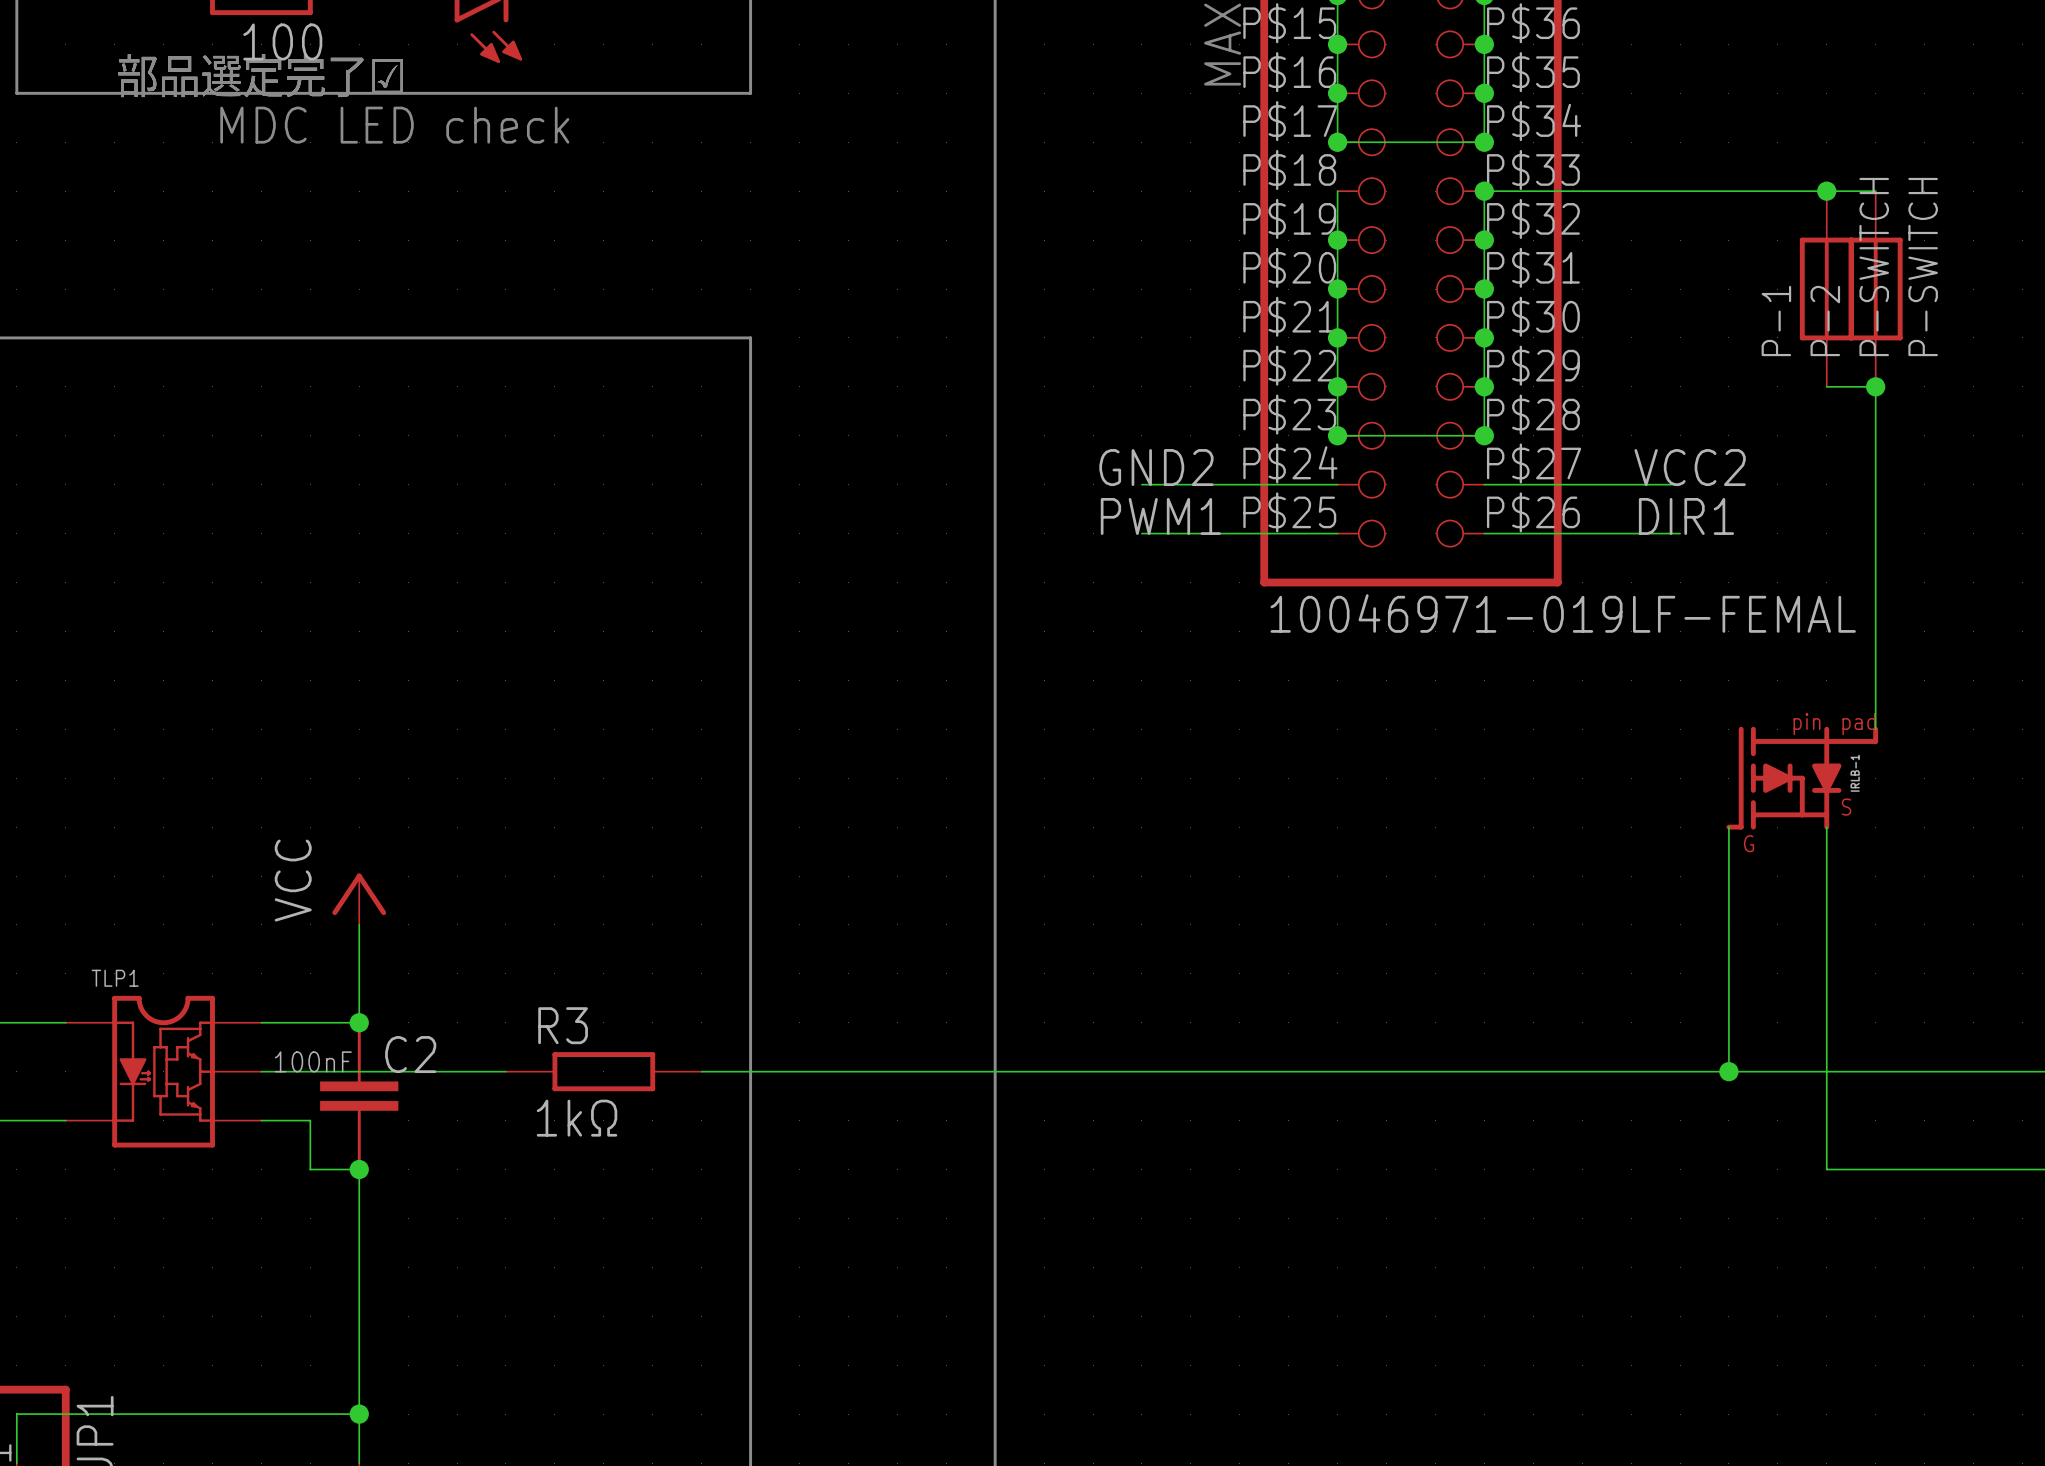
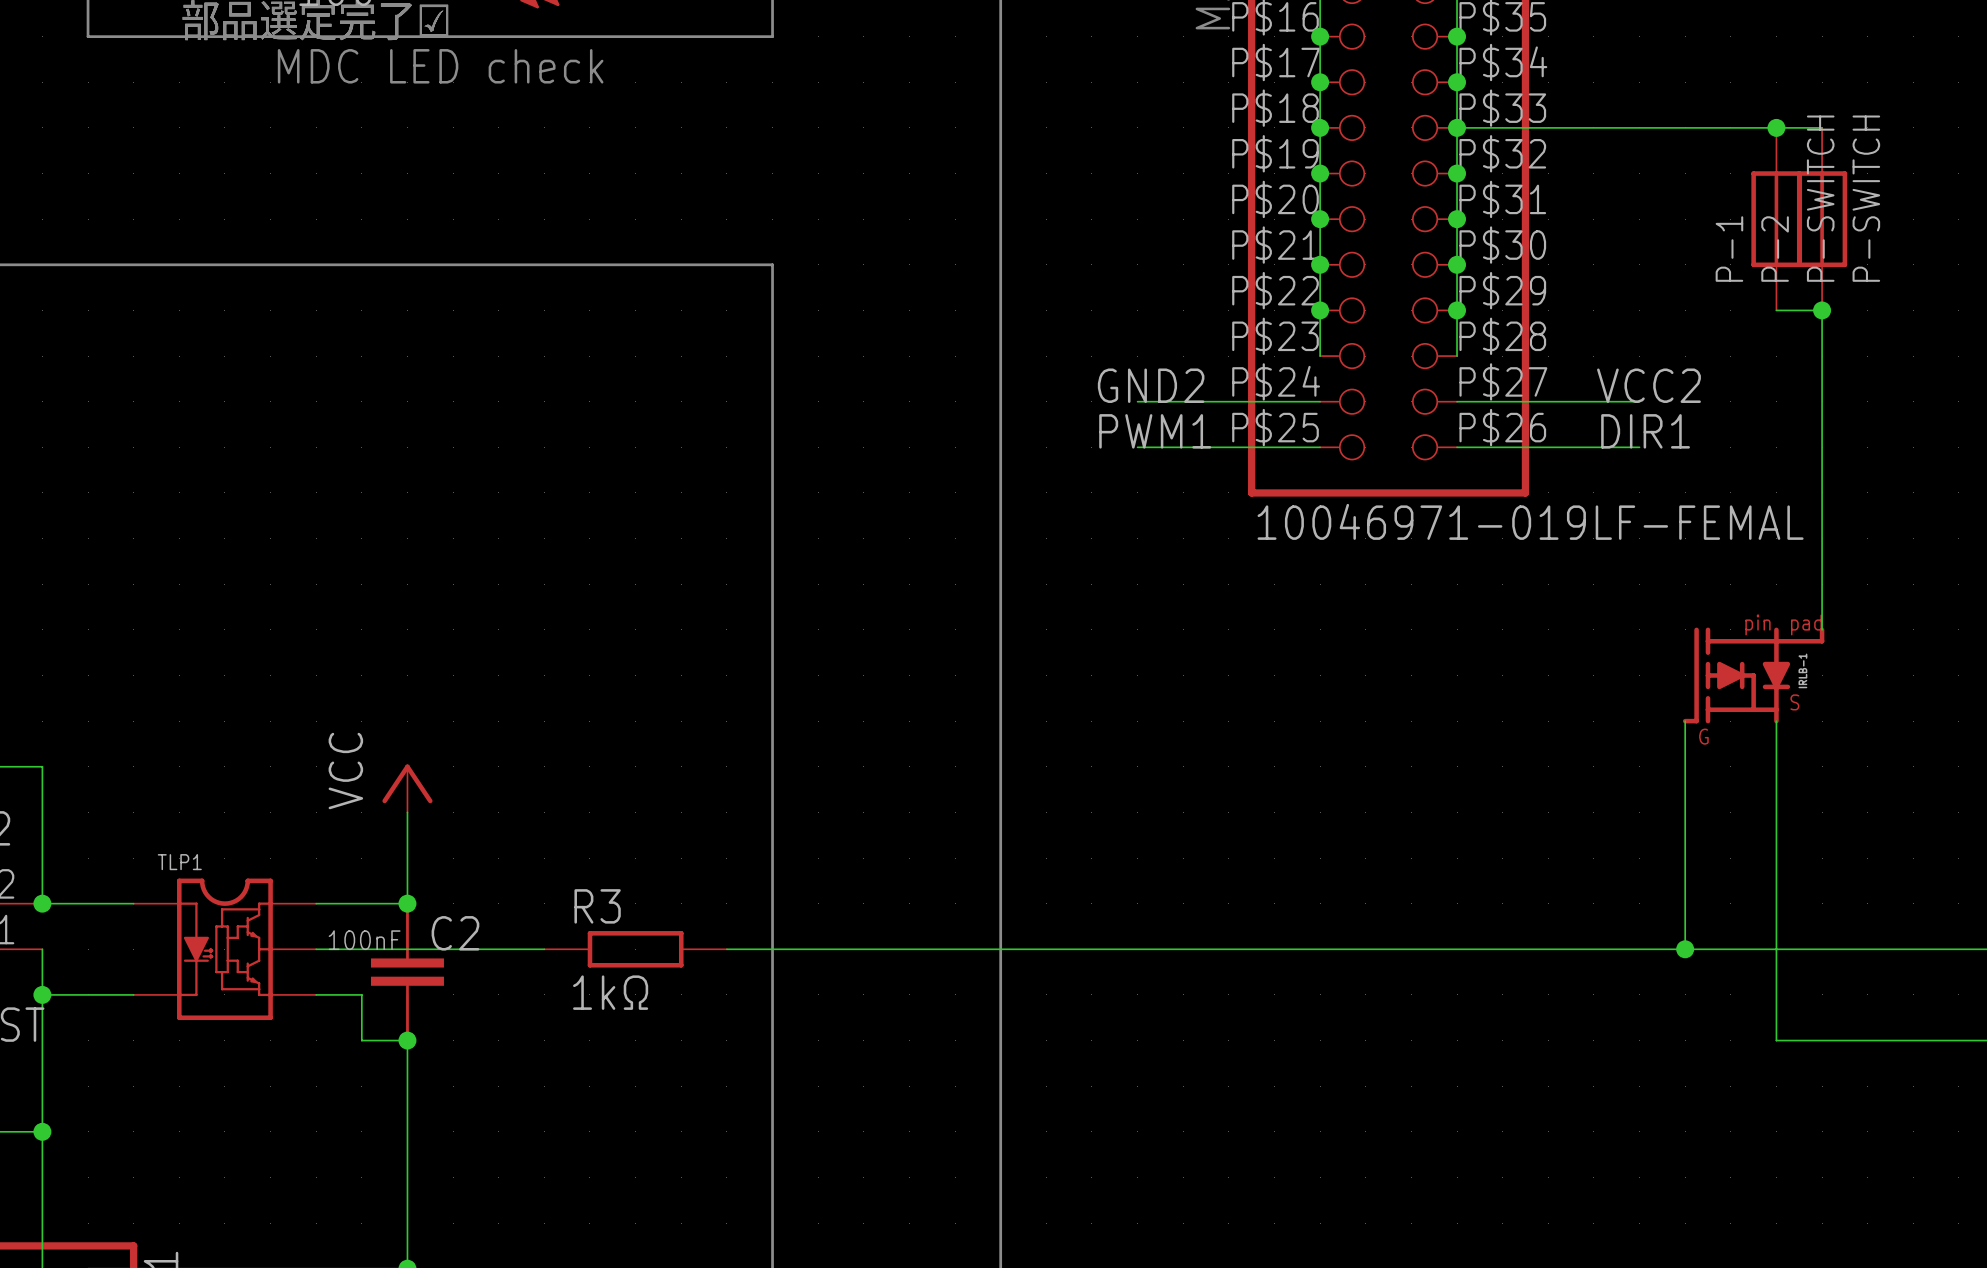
wire: (1337, 142) (1484, 142) -> (1320, 82) (1320, 127)
wire: none -> (1457, 82) (1457, 127)
junction: none -> (1320, 127)
wire: (1337, 435) (1484, 435) -> none
junction: (1337, 435) -> none
junction: (1484, 435) -> none

